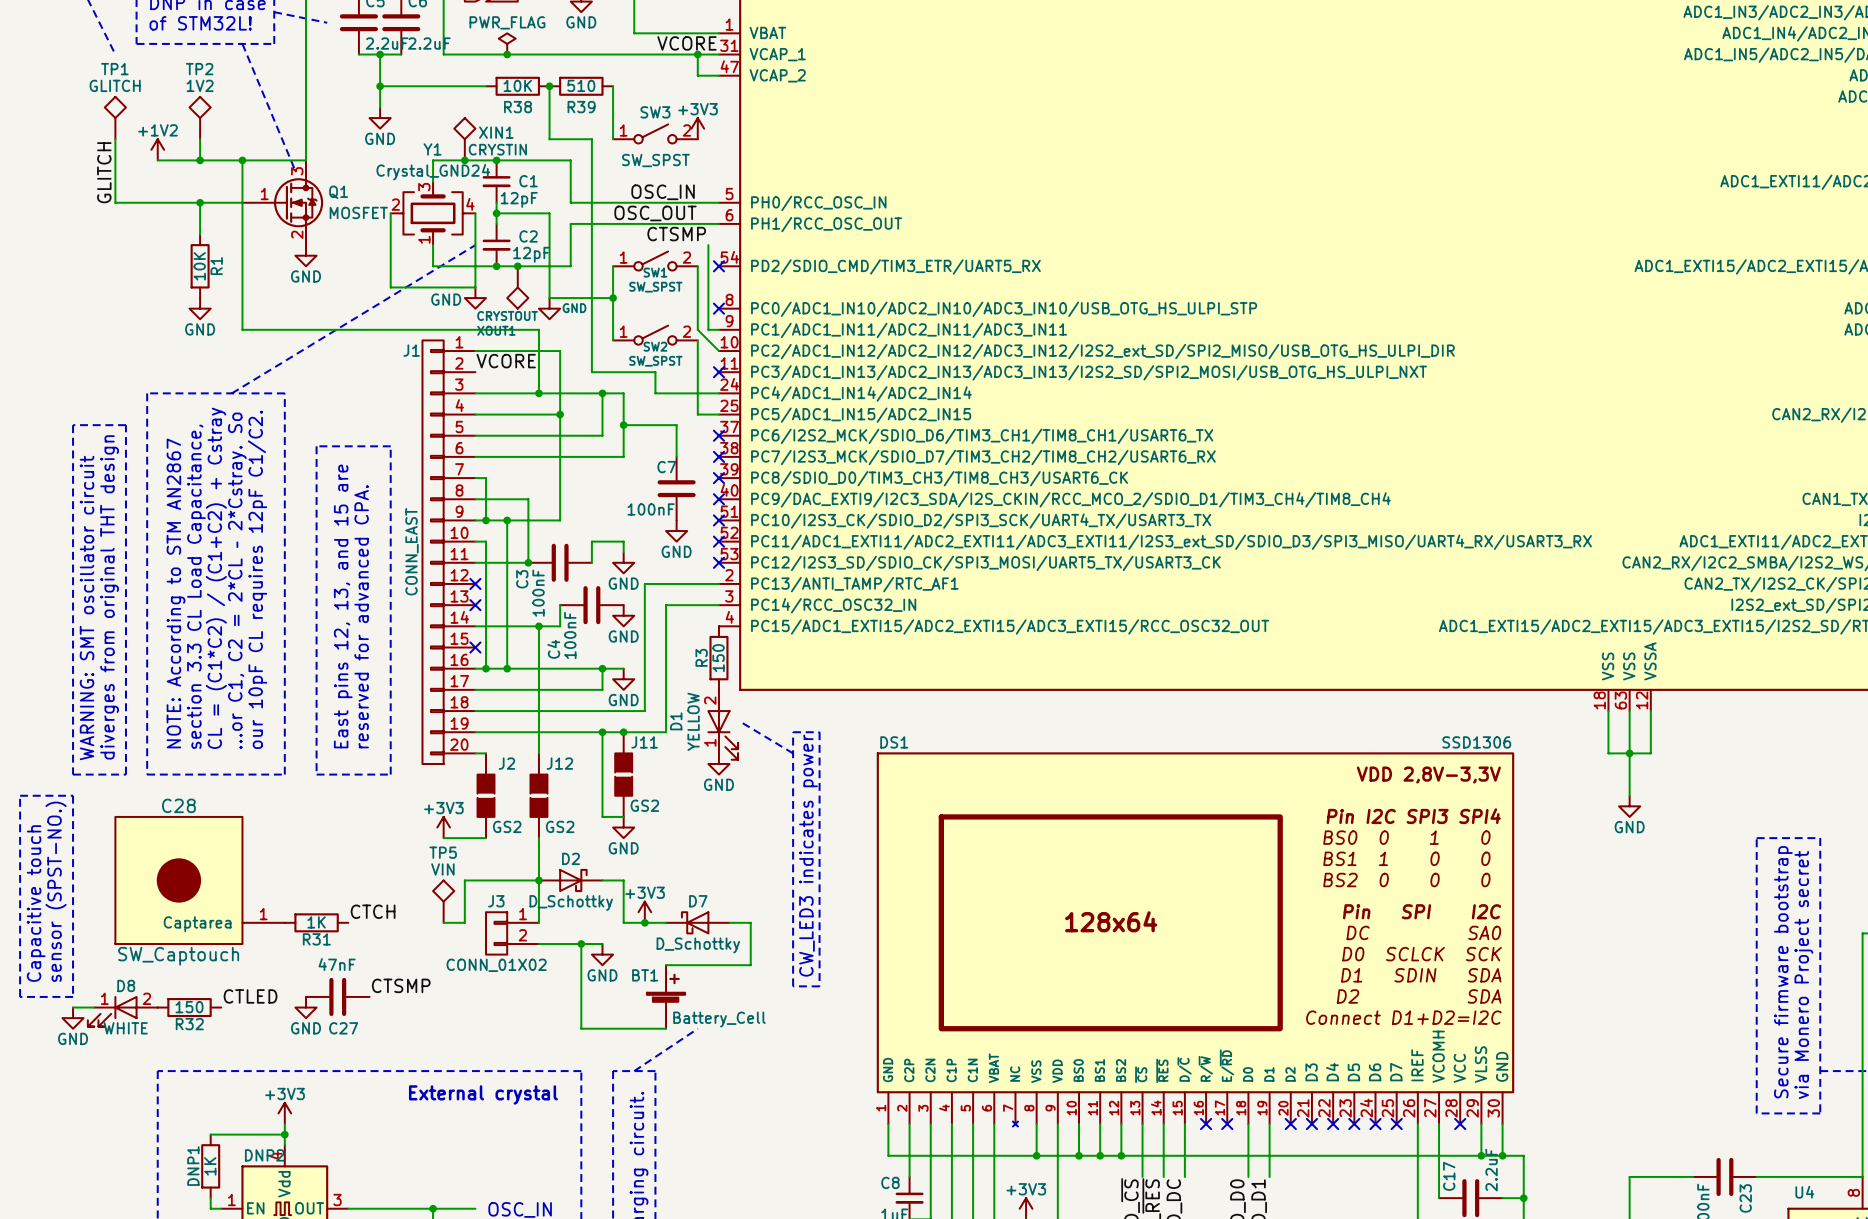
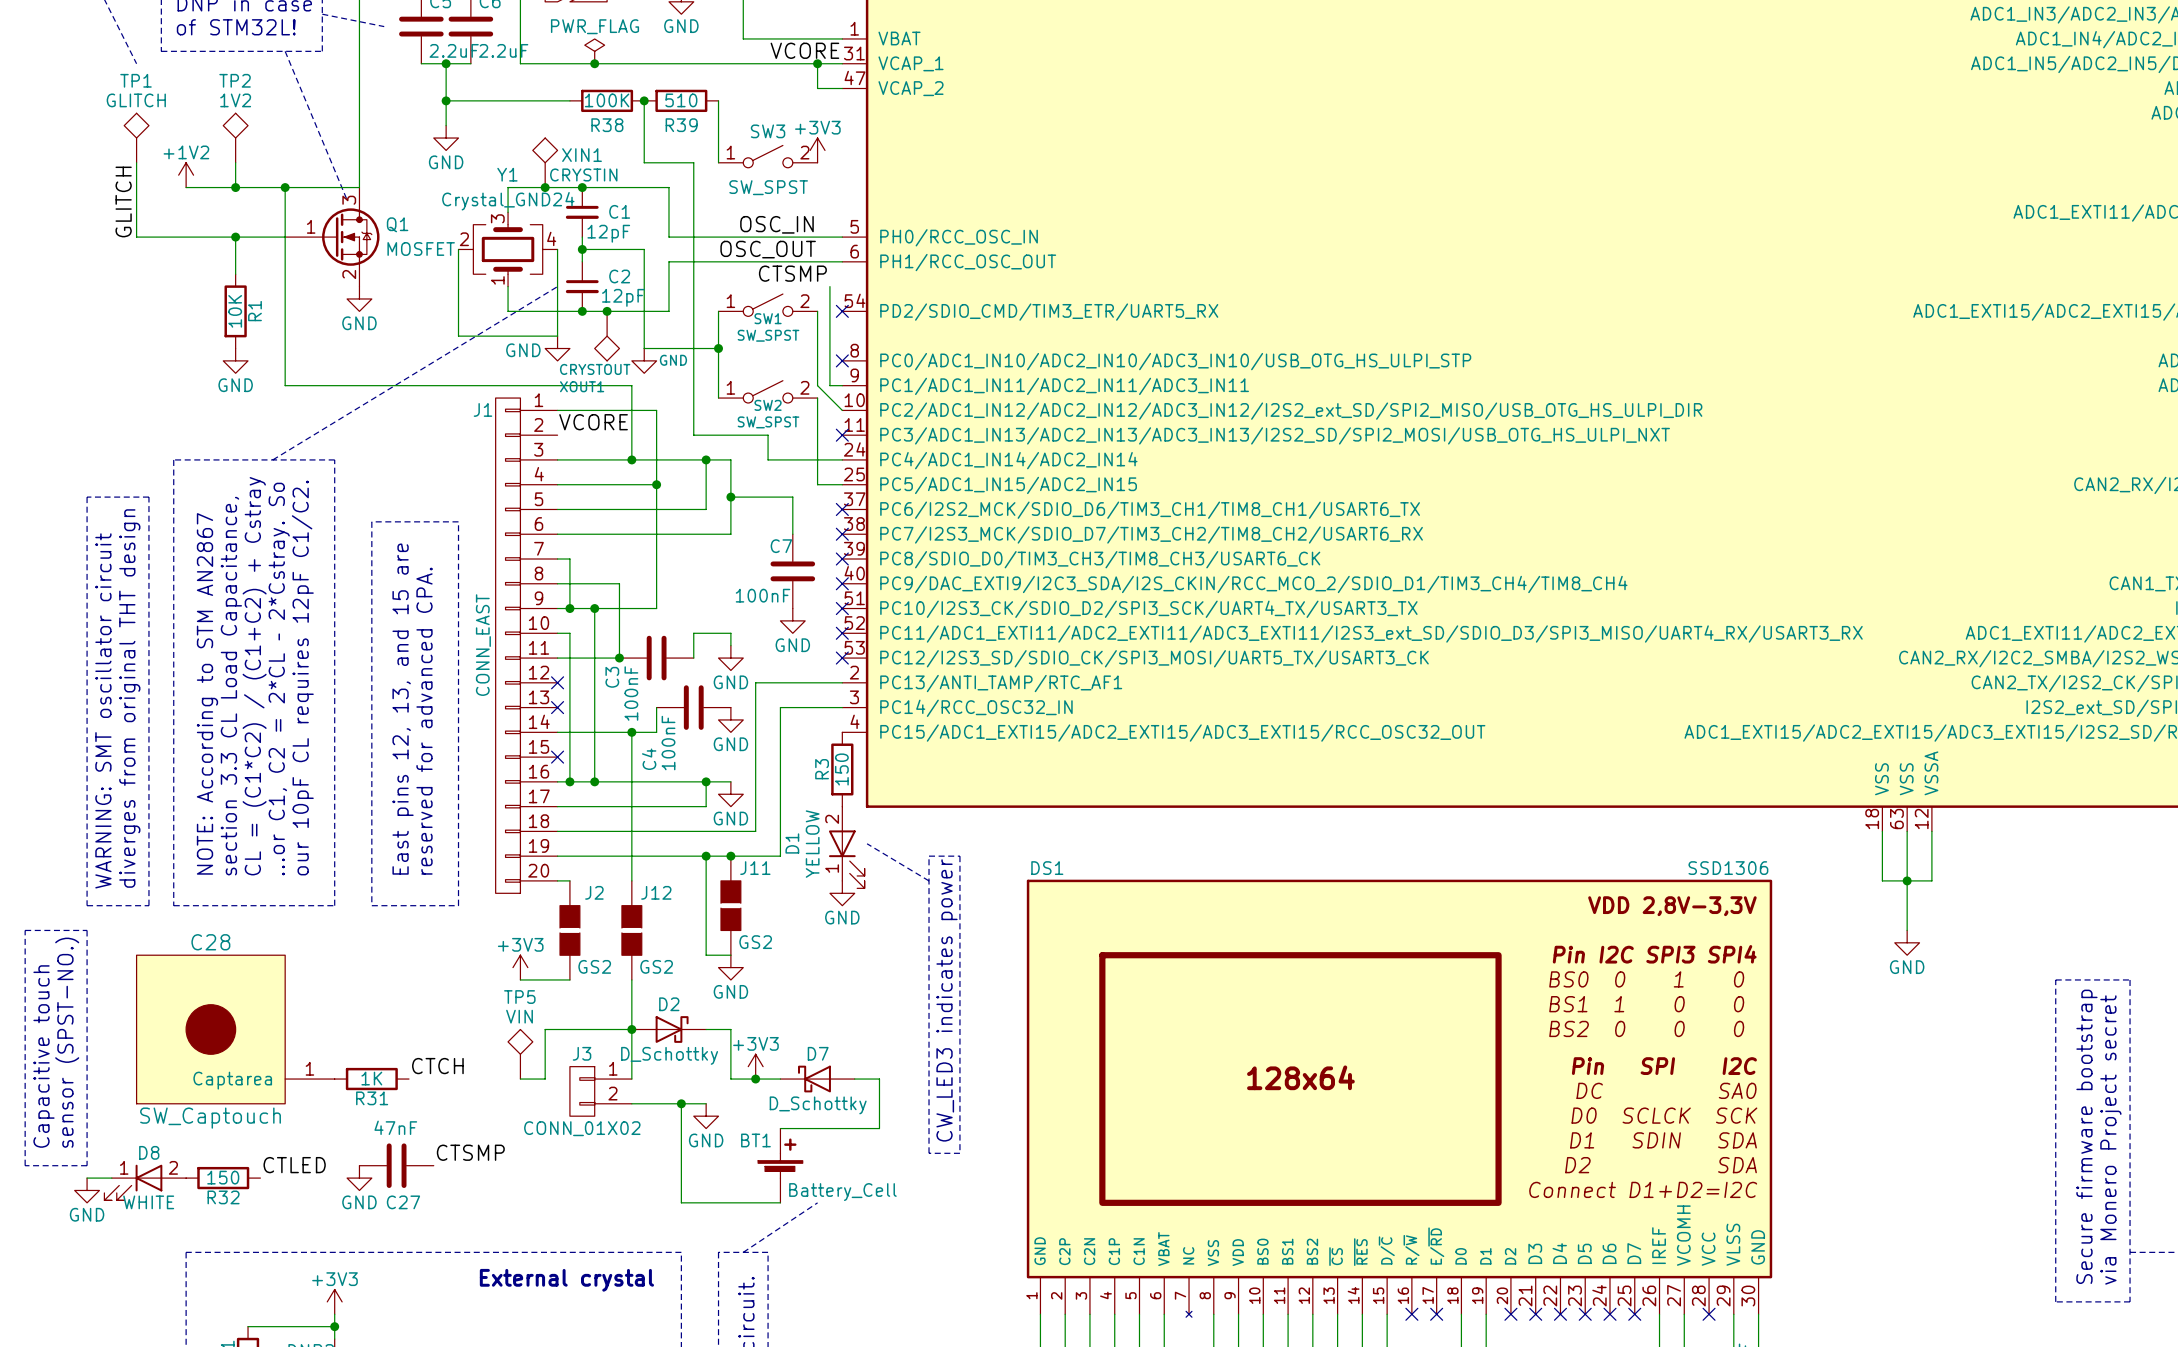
R38 value: 10K (517, 85) -> 100K (607, 100)

